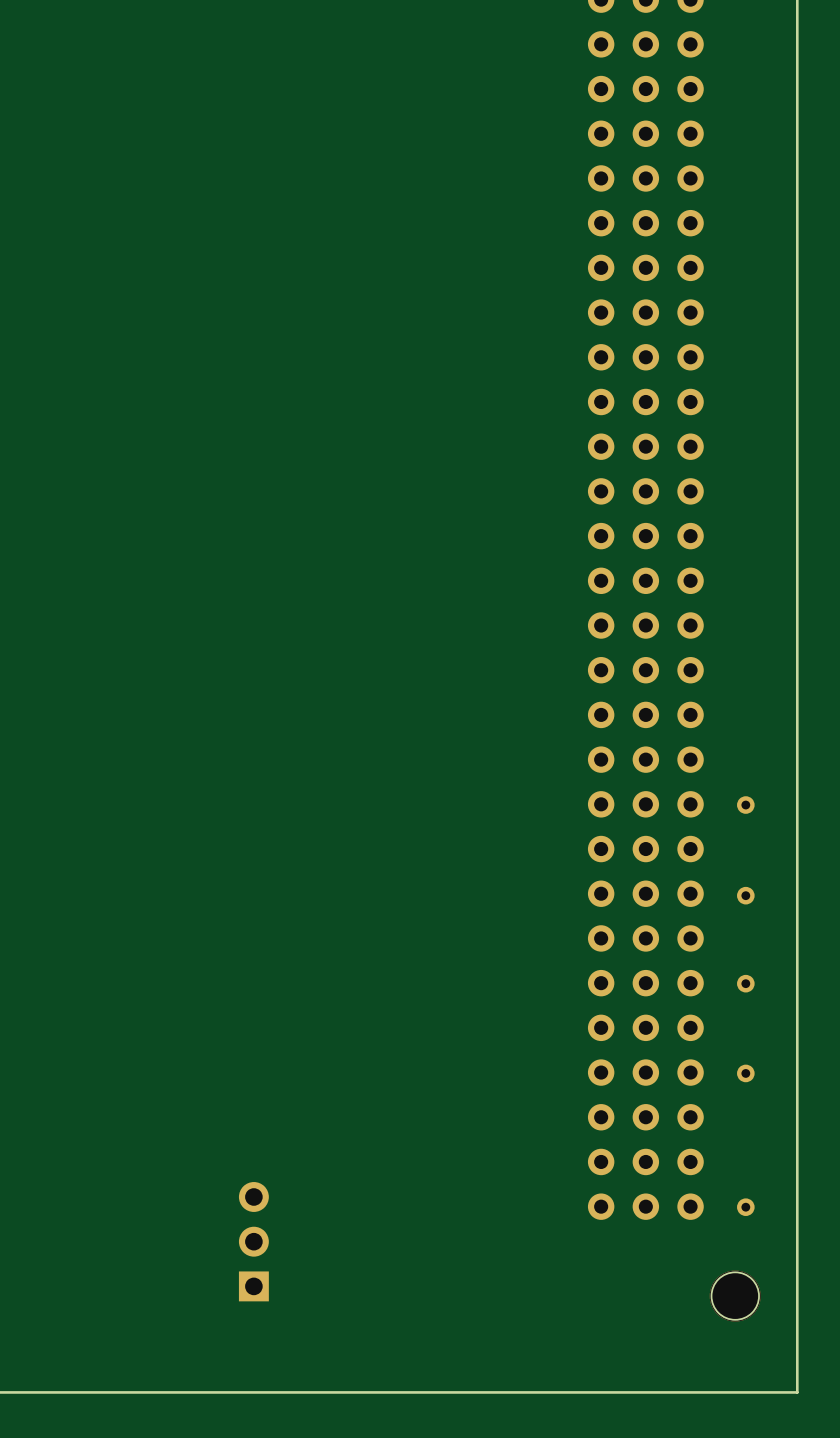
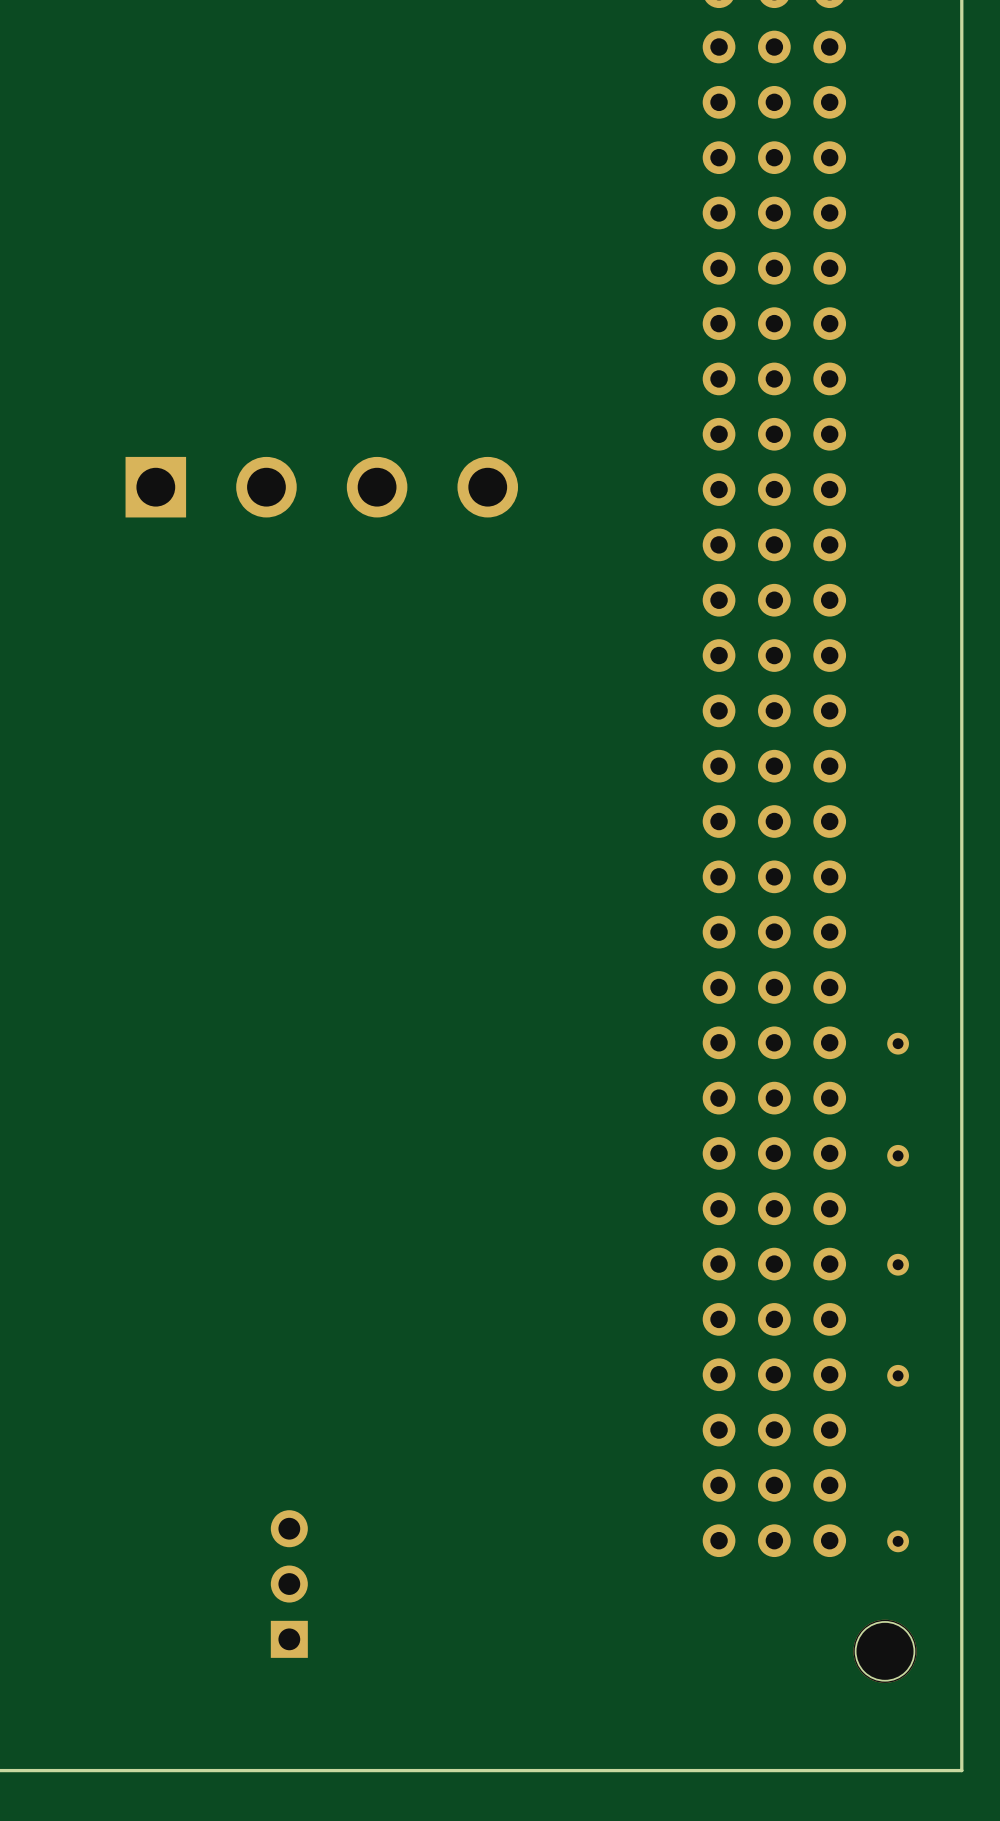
part: none -> (321, 487)

